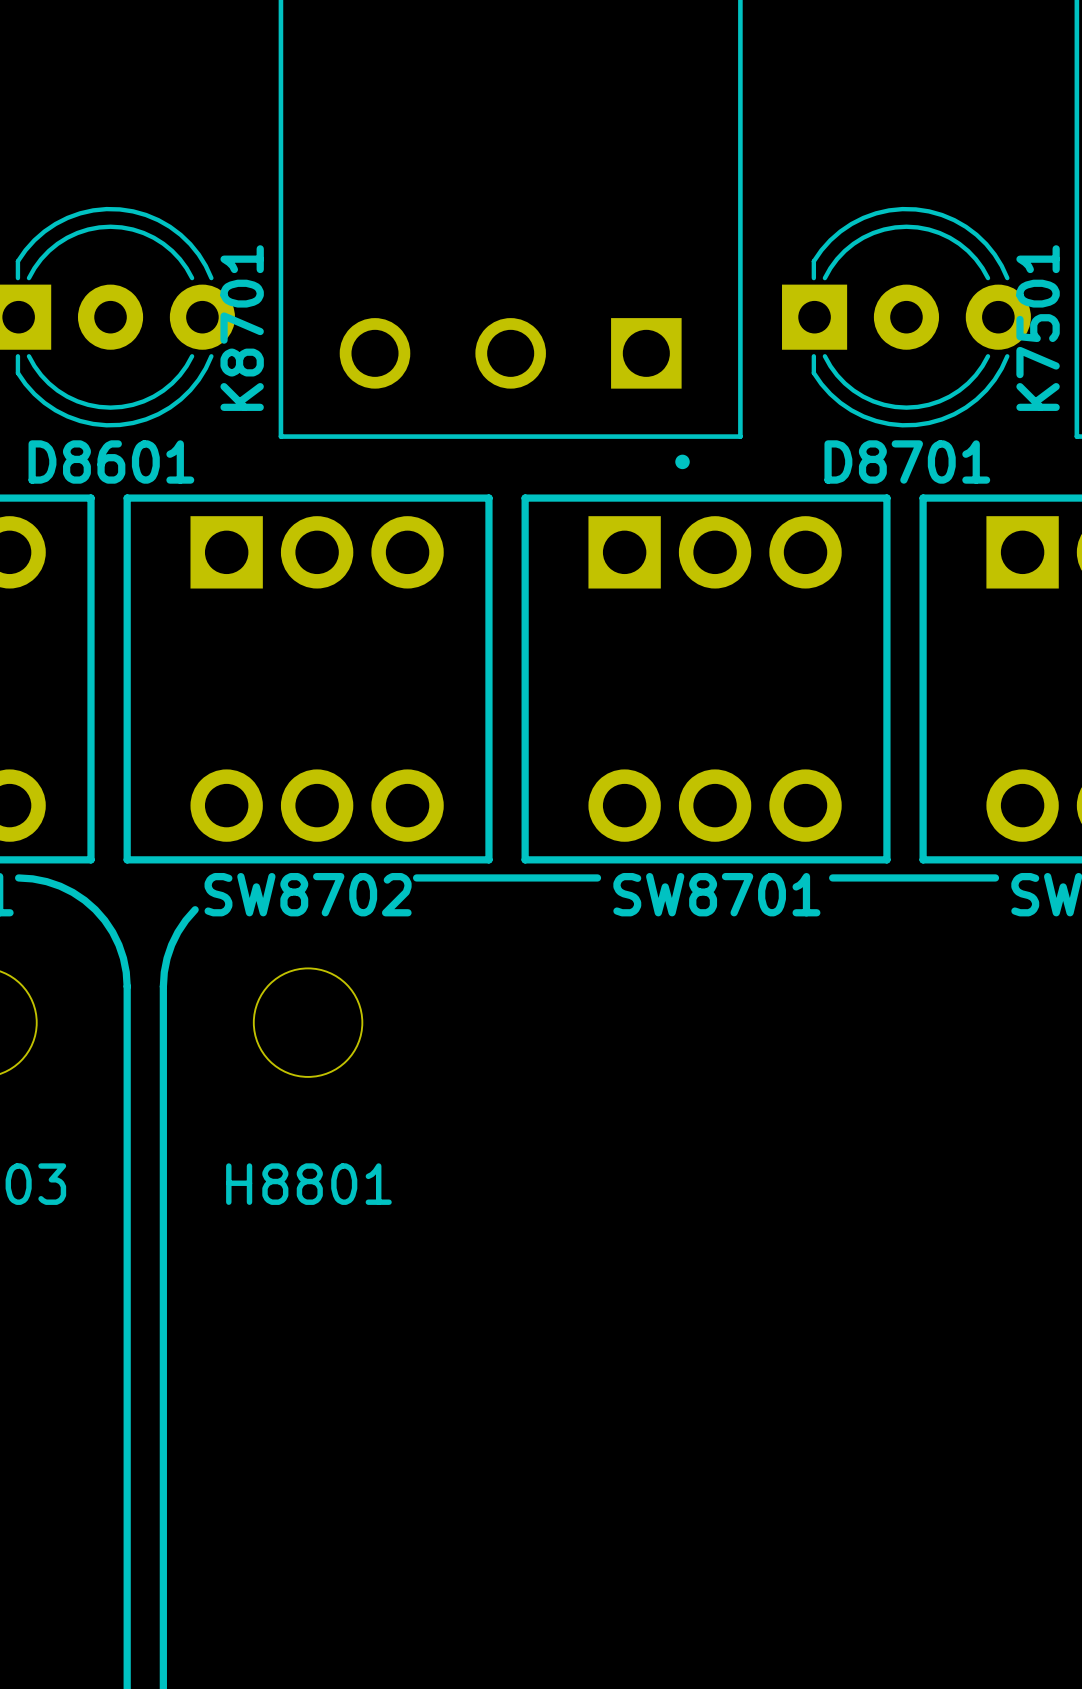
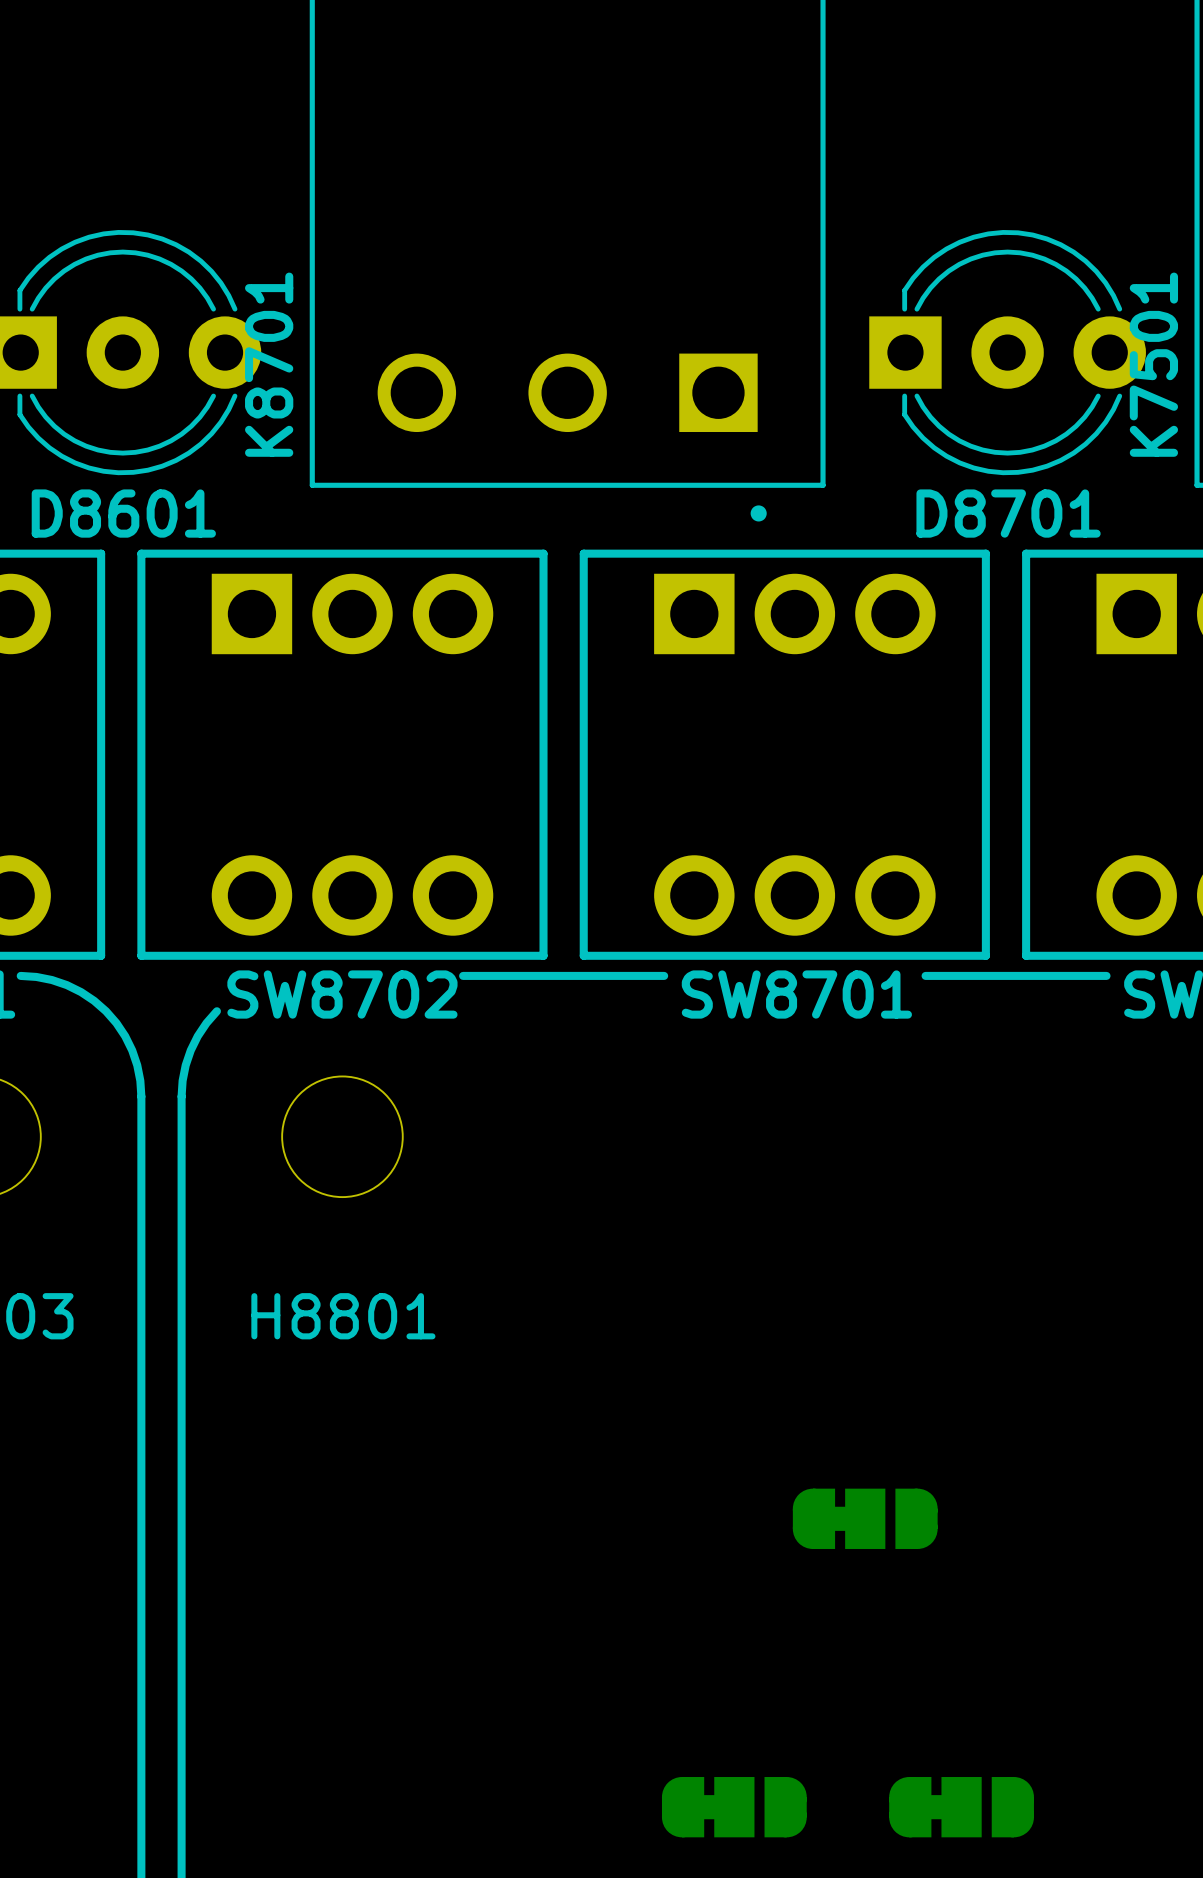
part: none -> (865, 1518)
part: none -> (734, 1807)
part: none -> (961, 1807)

